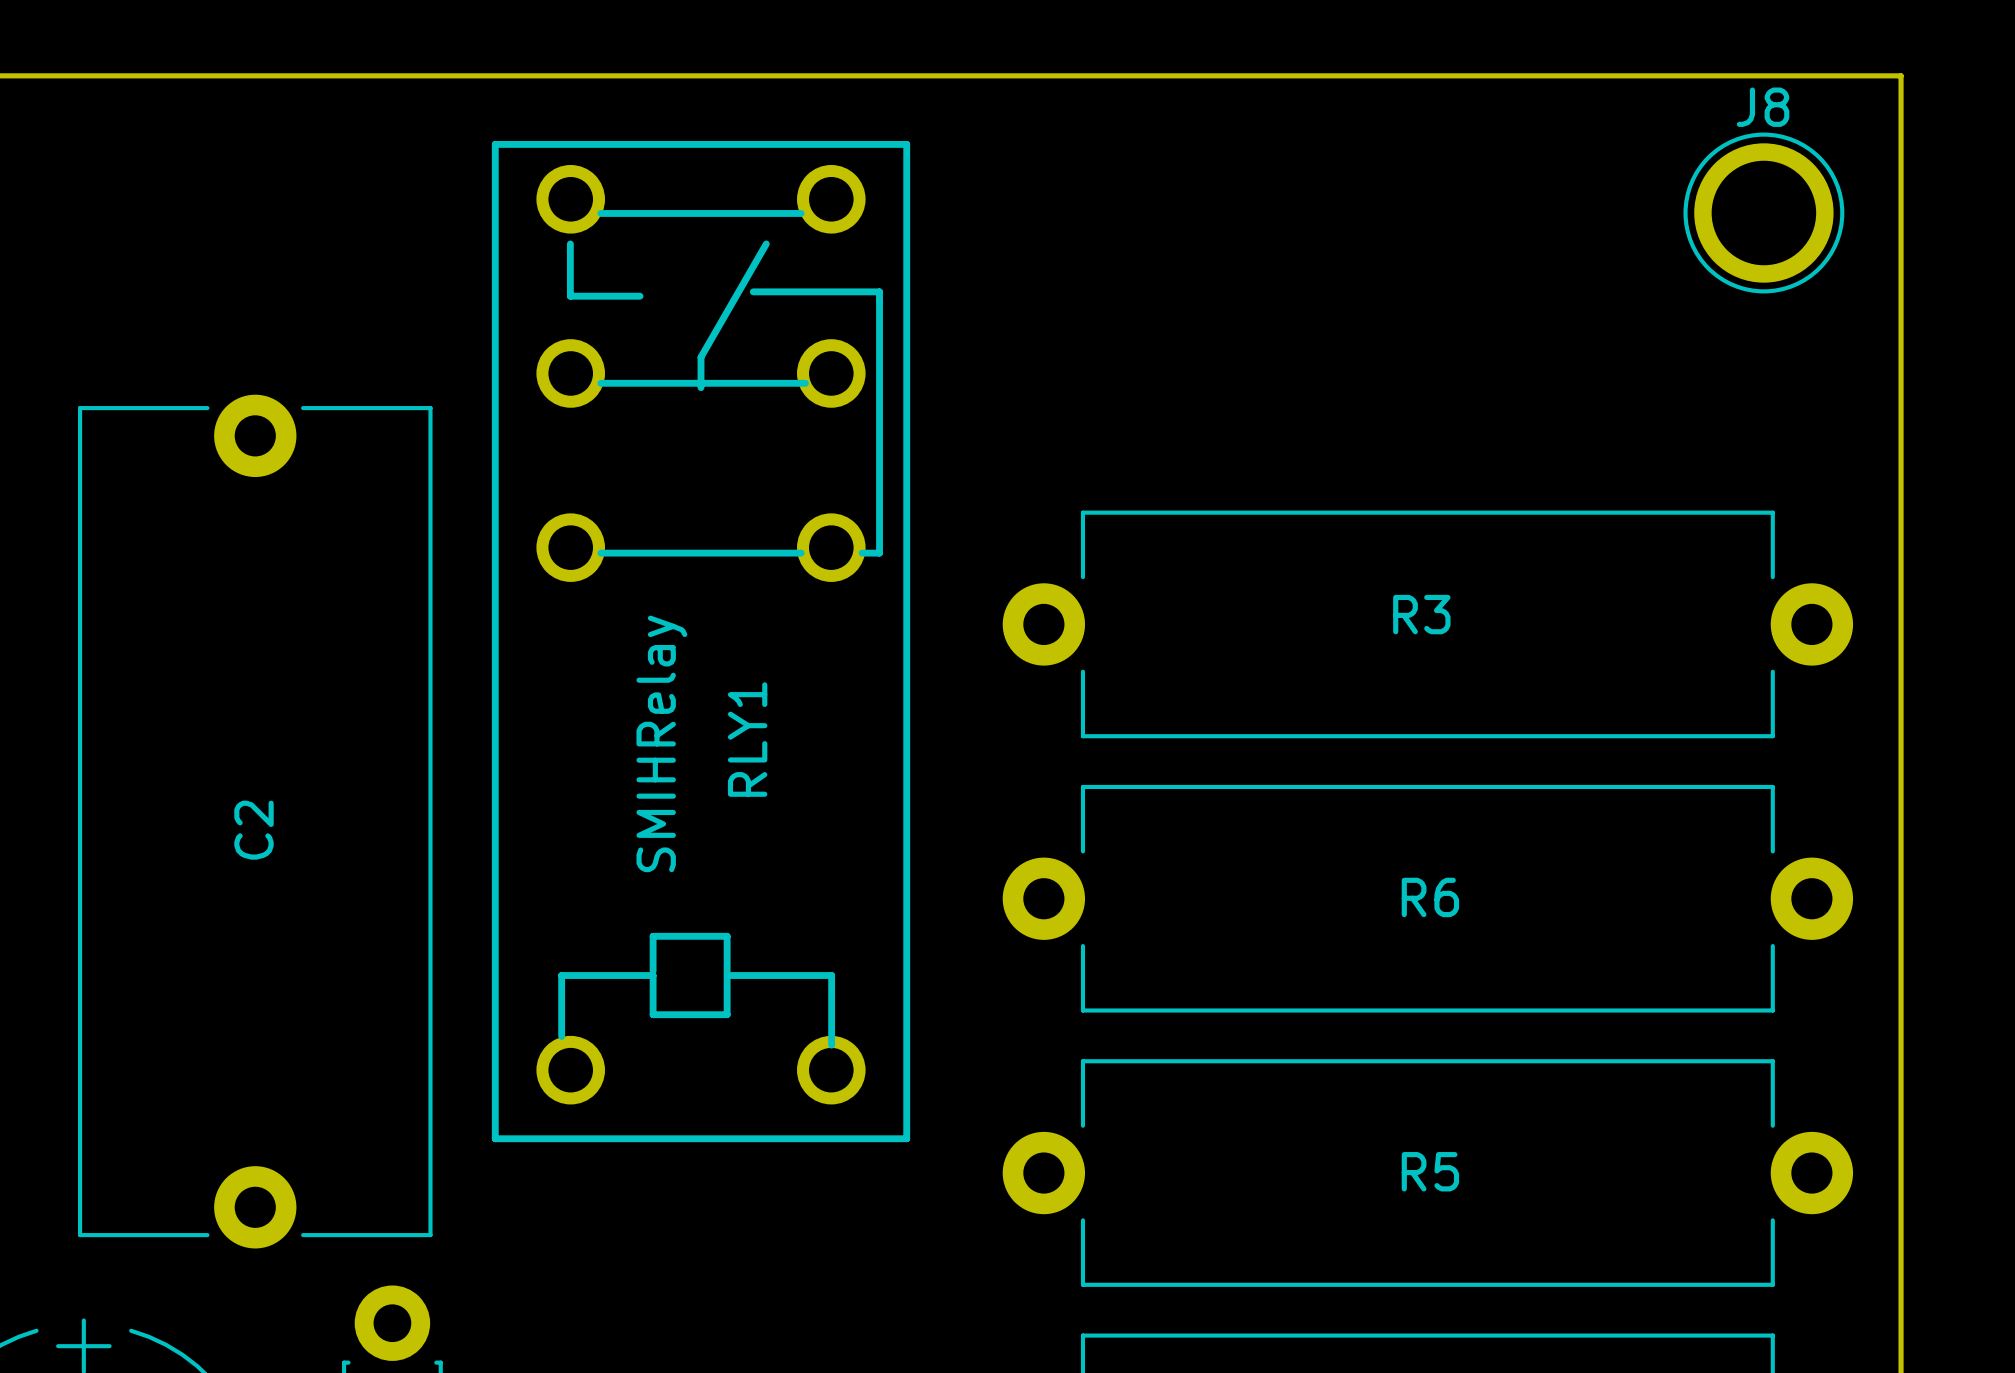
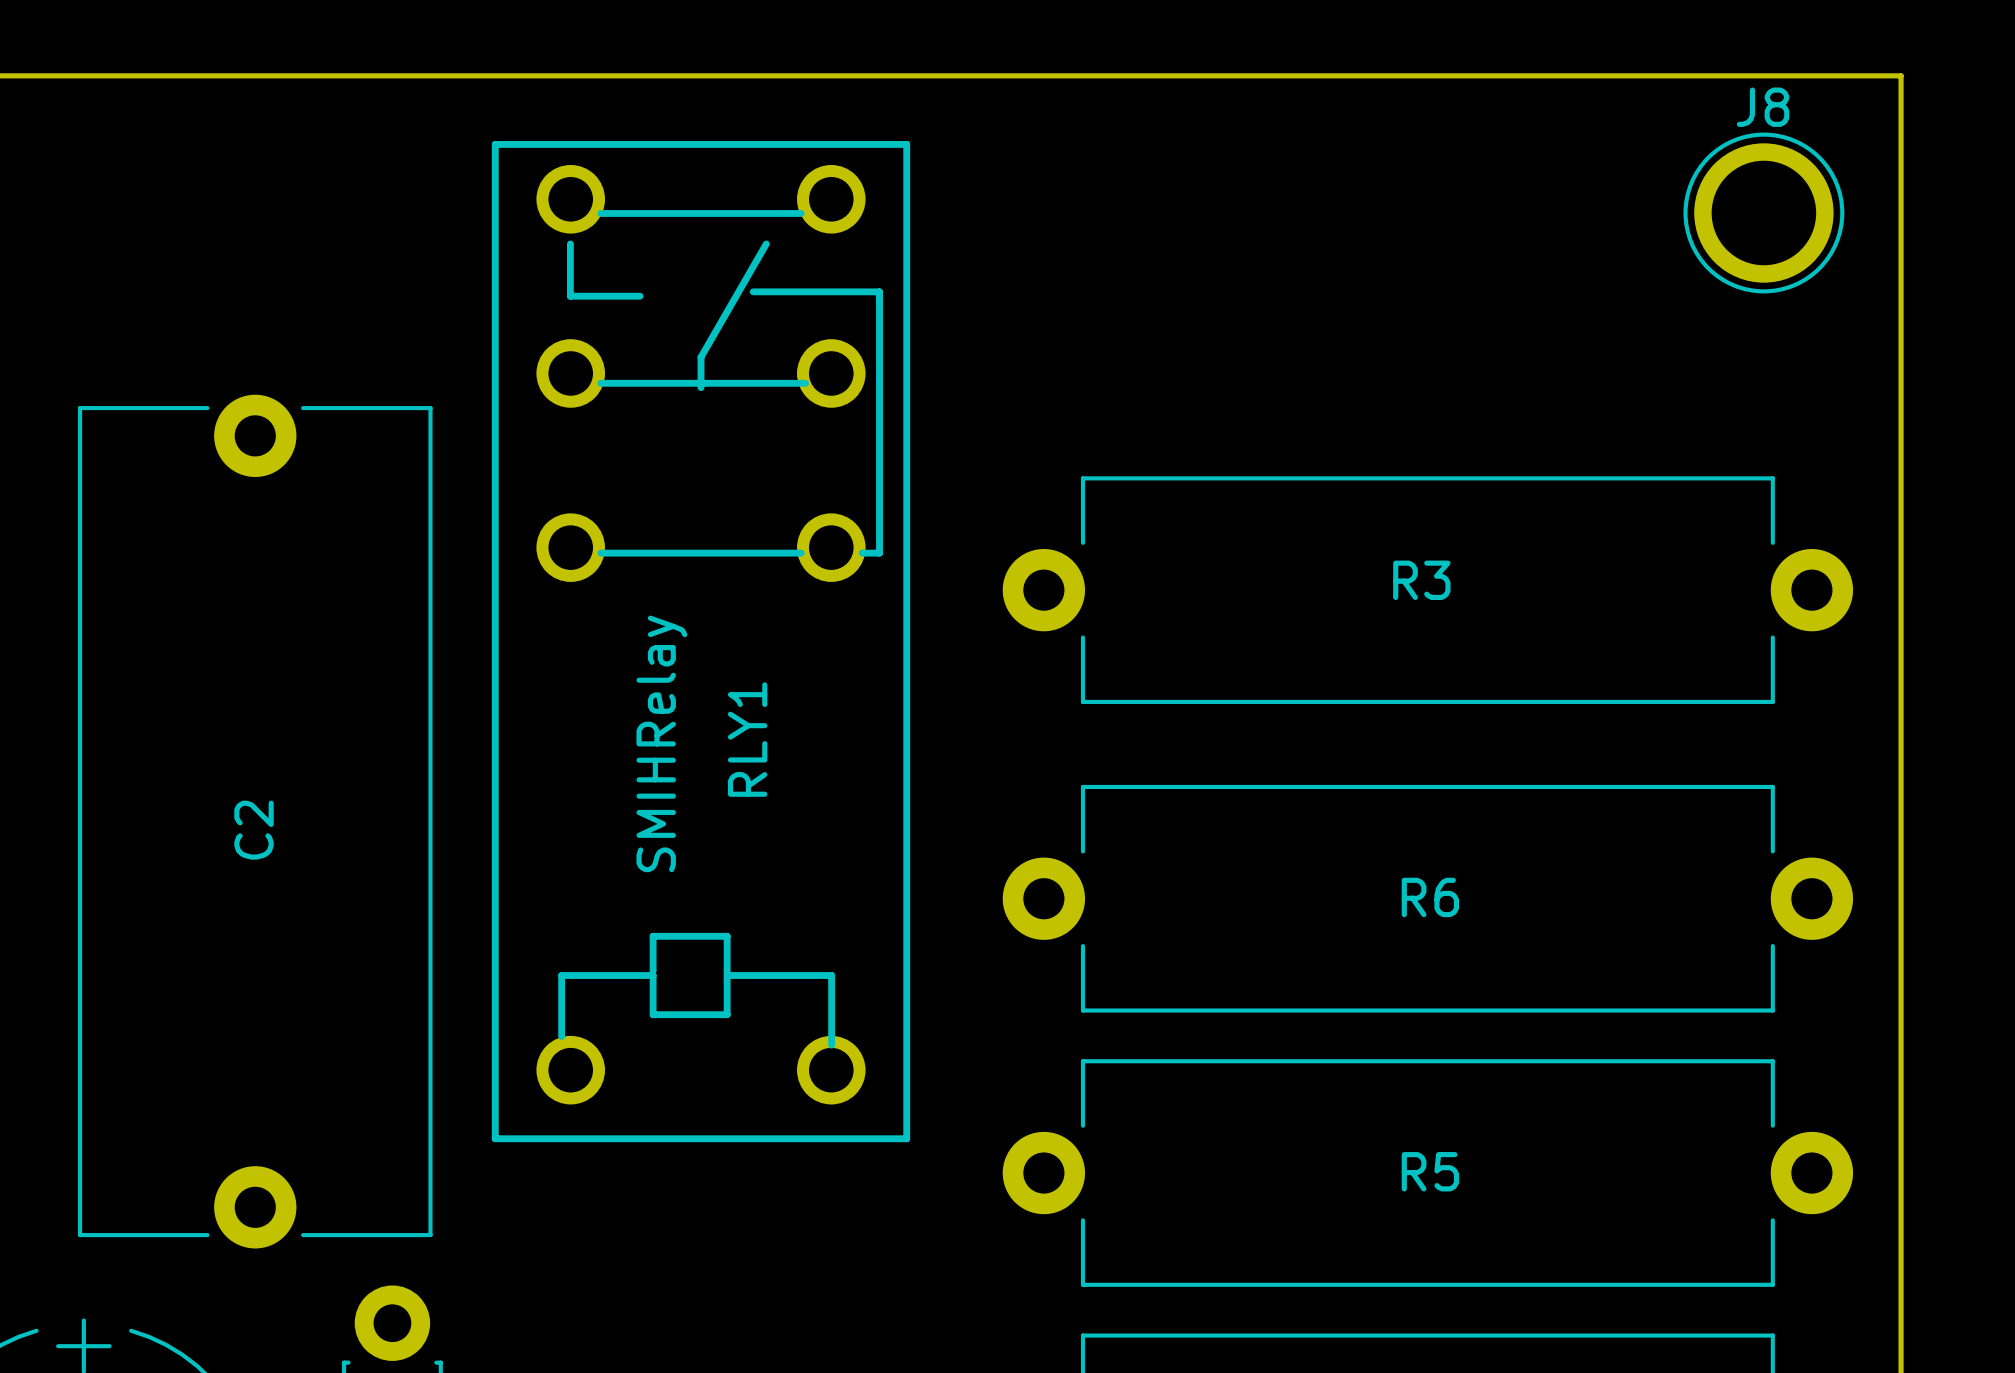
R3 position: (1427, 624) -> (1427, 590)

